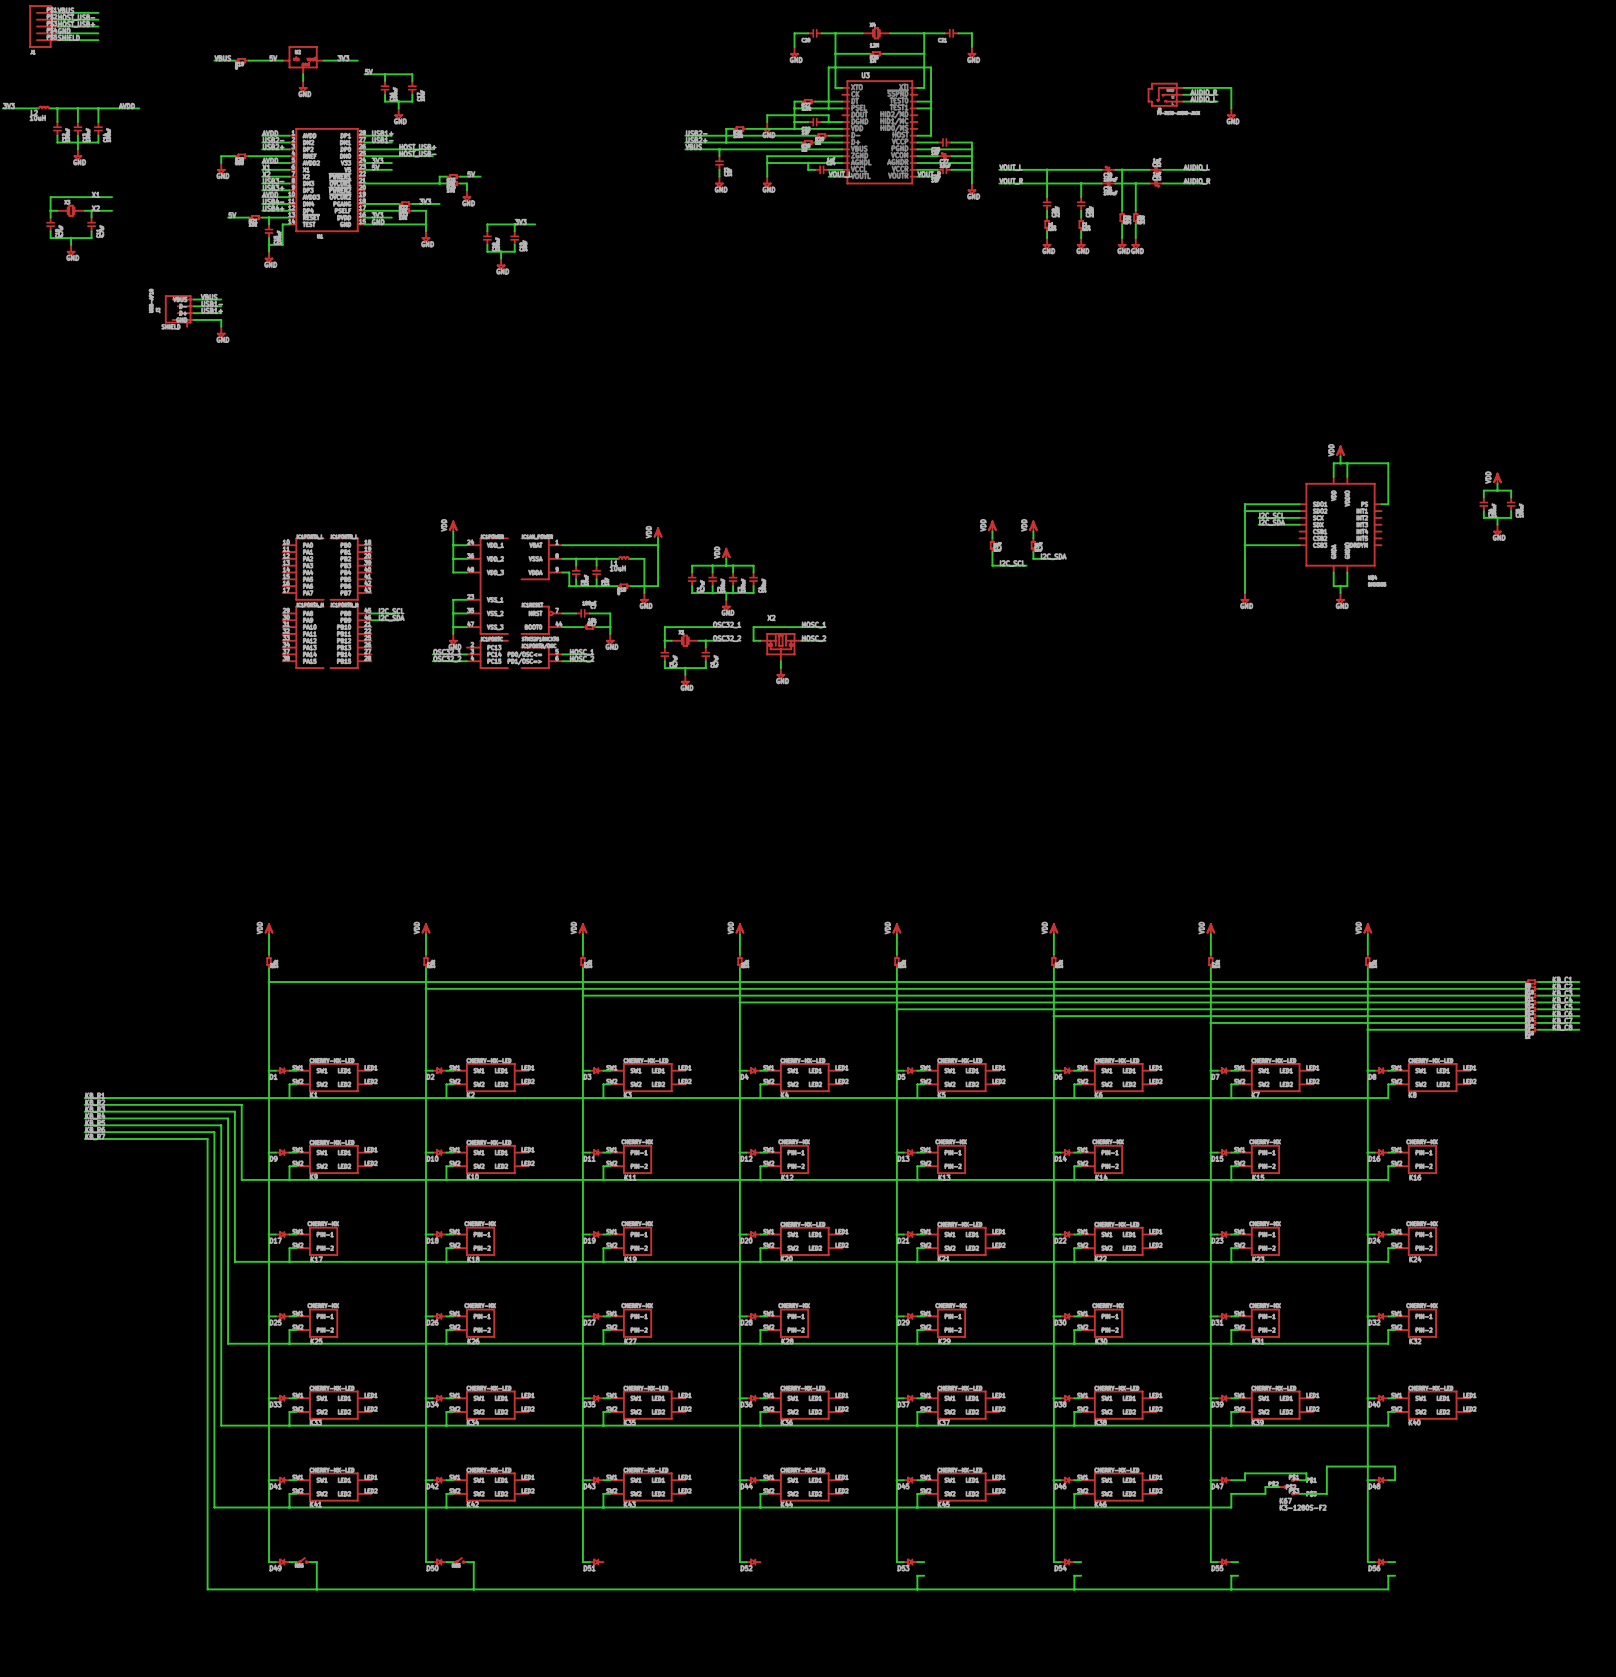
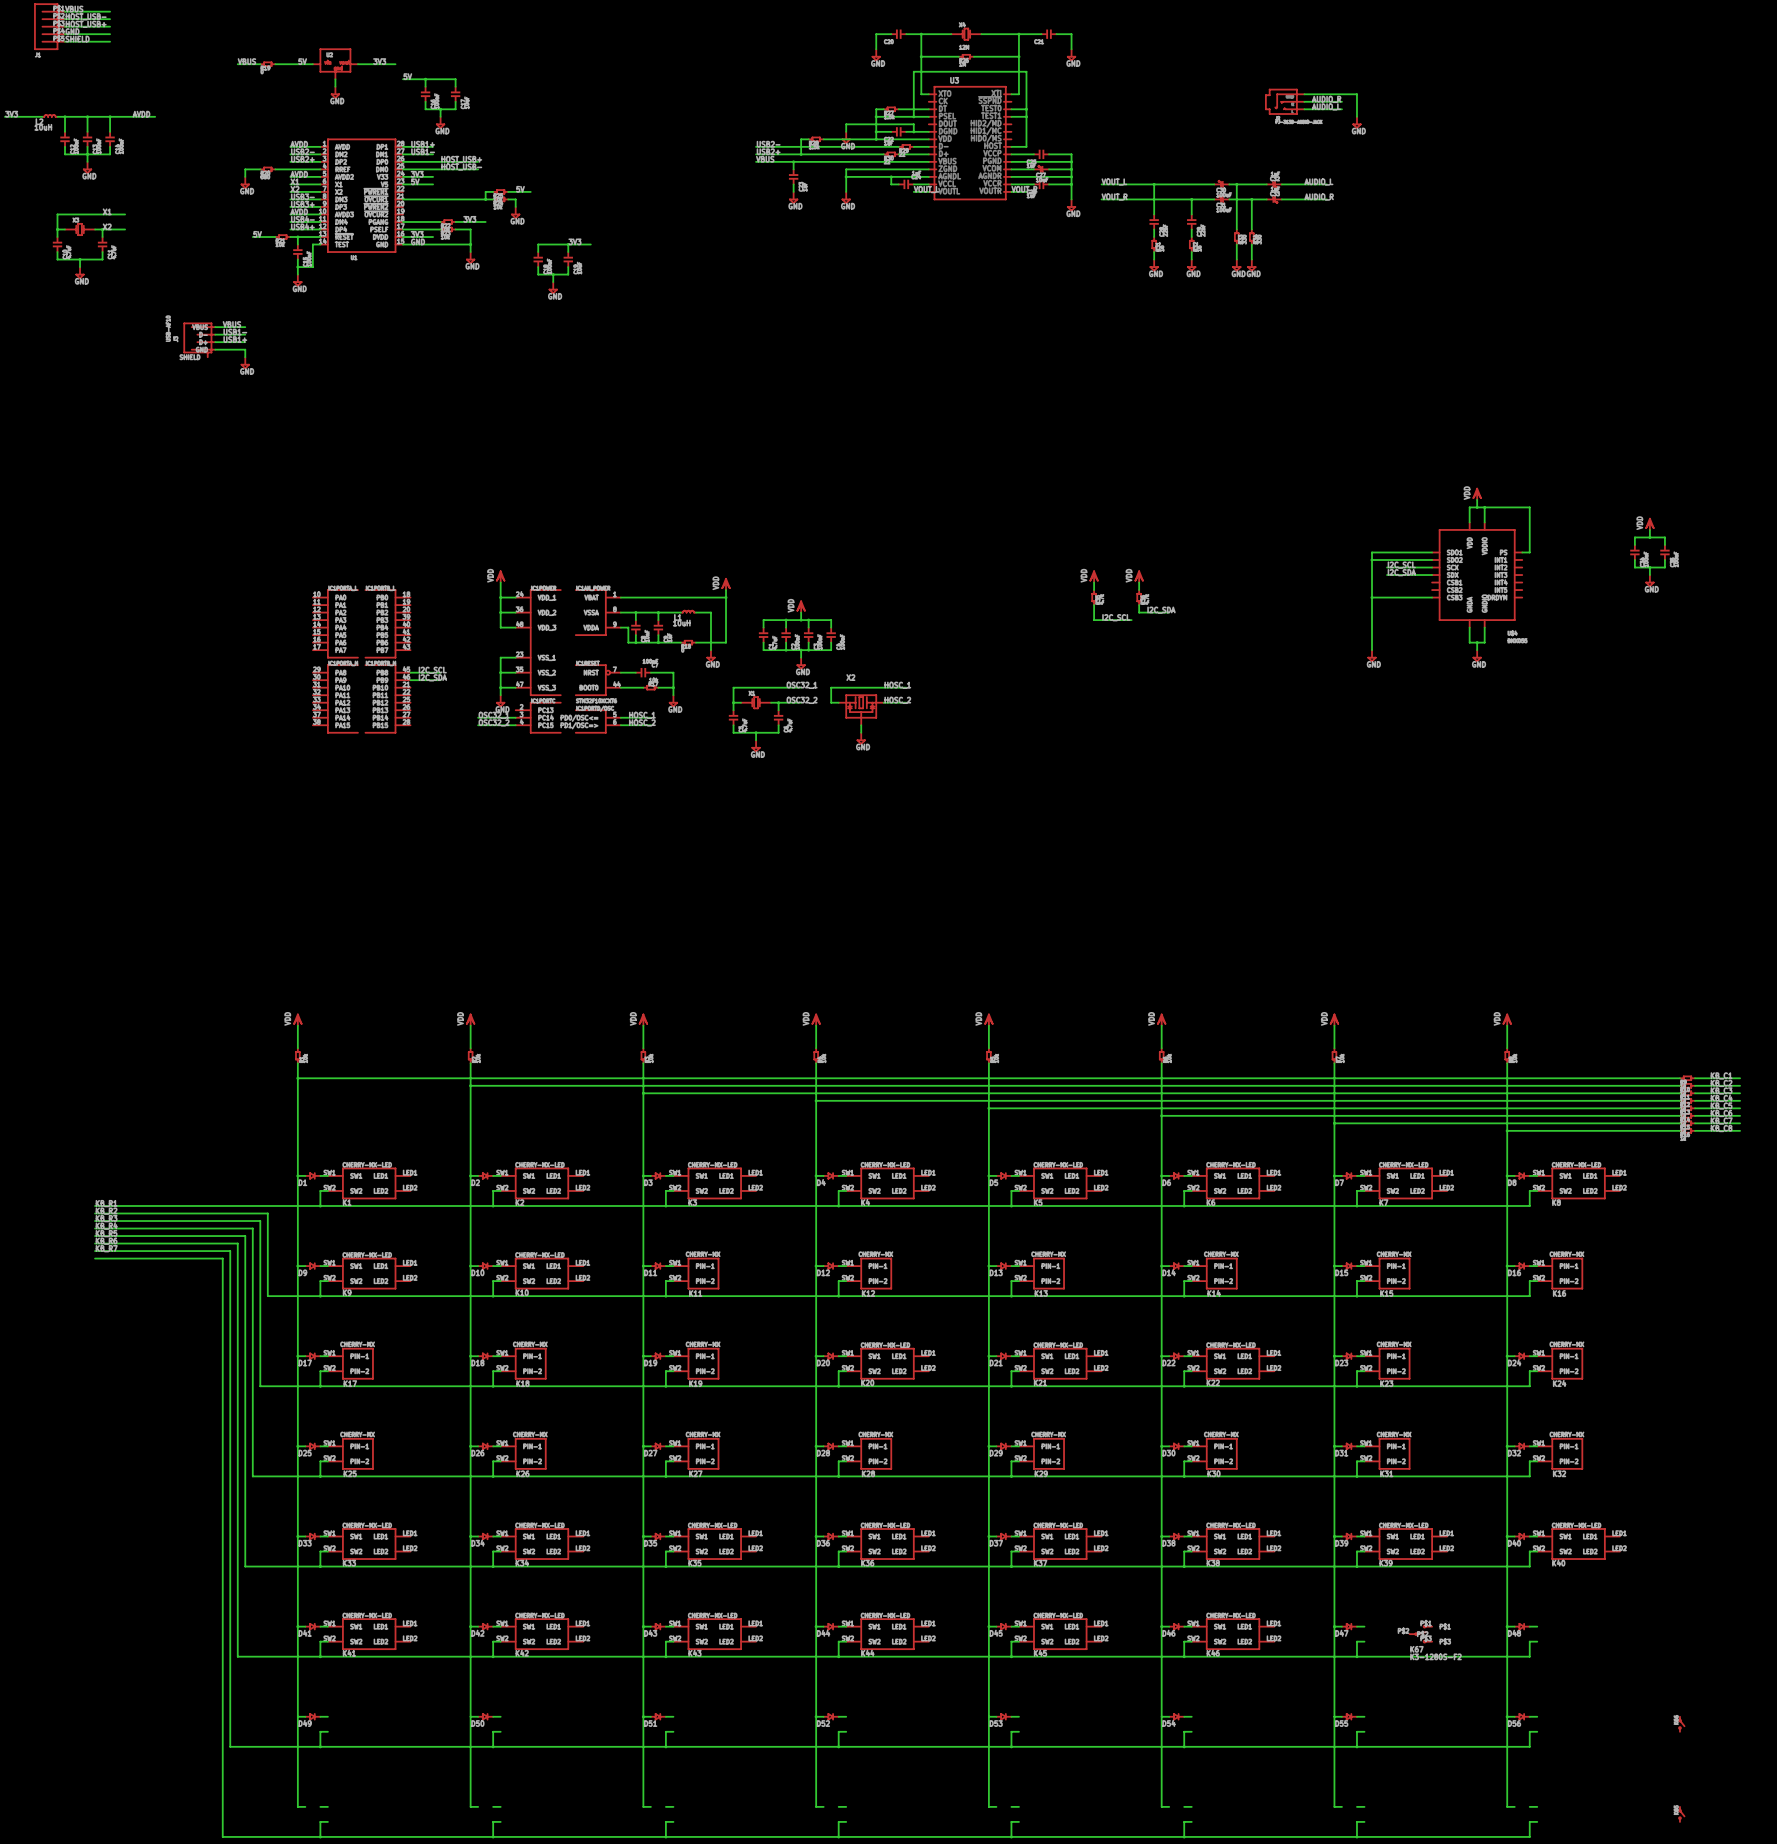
wire: none -> (95, 1258) (222, 1258) (222, 1836) (1529, 1836) (1529, 1821) (1537, 1821)
wire: (1238, 1480) (1244, 1480) (1244, 1473) (1306, 1473) (1306, 1480) (1299, 1480) -> none
wire: (1395, 1480) (1395, 1466) (1326, 1466) (1326, 1493) (1299, 1493) -> none
wire: (1279, 1487) (1265, 1487) (1265, 1493) (1238, 1493) -> none
wire: none -> (1537, 1641) (1529, 1641) (1529, 1656) (1356, 1656)
part rotation: 0° (303, 1560) -> 90° clockwise (1681, 1724)
part position: (303, 1560) -> (1681, 1724)
part rotation: 0° (460, 1560) -> 90° clockwise (1681, 1814)
part position: (460, 1560) -> (1681, 1814)
wire: none -> (297, 1716) (297, 1806) (305, 1806)
wire: (309, 1562) (316, 1562) (316, 1589) -> none
wire: none -> (470, 1716) (470, 1806) (478, 1806)
wire: (466, 1562) (473, 1562) (473, 1589) -> none
wire: none -> (643, 1716) (643, 1806) (650, 1806)
wire: none -> (665, 1716) (673, 1716)
wire: none -> (816, 1716) (816, 1806) (823, 1806)
wire: none -> (838, 1716) (846, 1716)
wire: none -> (988, 1716) (988, 1806) (996, 1806)
wire: none -> (1161, 1716) (1161, 1806) (1169, 1806)
wire: none -> (1334, 1716) (1334, 1806) (1341, 1806)
wire: none -> (1507, 1716) (1507, 1806) (1514, 1806)
wire: none -> (327, 1731) (320, 1731) (320, 1746)
wire: none -> (500, 1731) (493, 1731) (493, 1746)
wire: none -> (673, 1731) (665, 1731) (665, 1746)
wire: none -> (846, 1731) (838, 1731) (838, 1746)
wire: none -> (320, 1806) (327, 1806)
wire: none -> (493, 1806) (500, 1806)
wire: none -> (665, 1806) (673, 1806)
wire: none -> (838, 1806) (846, 1806)
wire: none -> (1011, 1806) (1018, 1806)
wire: none -> (1184, 1806) (1191, 1806)
wire: none -> (1356, 1806) (1364, 1806)
wire: none -> (1529, 1806) (1537, 1806)
wire: none -> (327, 1821) (320, 1821) (320, 1836)
wire: none -> (500, 1821) (493, 1821) (493, 1836)
wire: none -> (673, 1821) (665, 1821) (665, 1836)
wire: none -> (846, 1821) (838, 1821) (838, 1836)
wire: none -> (1018, 1821) (1011, 1821) (1011, 1836)
wire: none -> (1191, 1821) (1184, 1821) (1184, 1836)
wire: none -> (1364, 1821) (1356, 1821) (1356, 1836)

